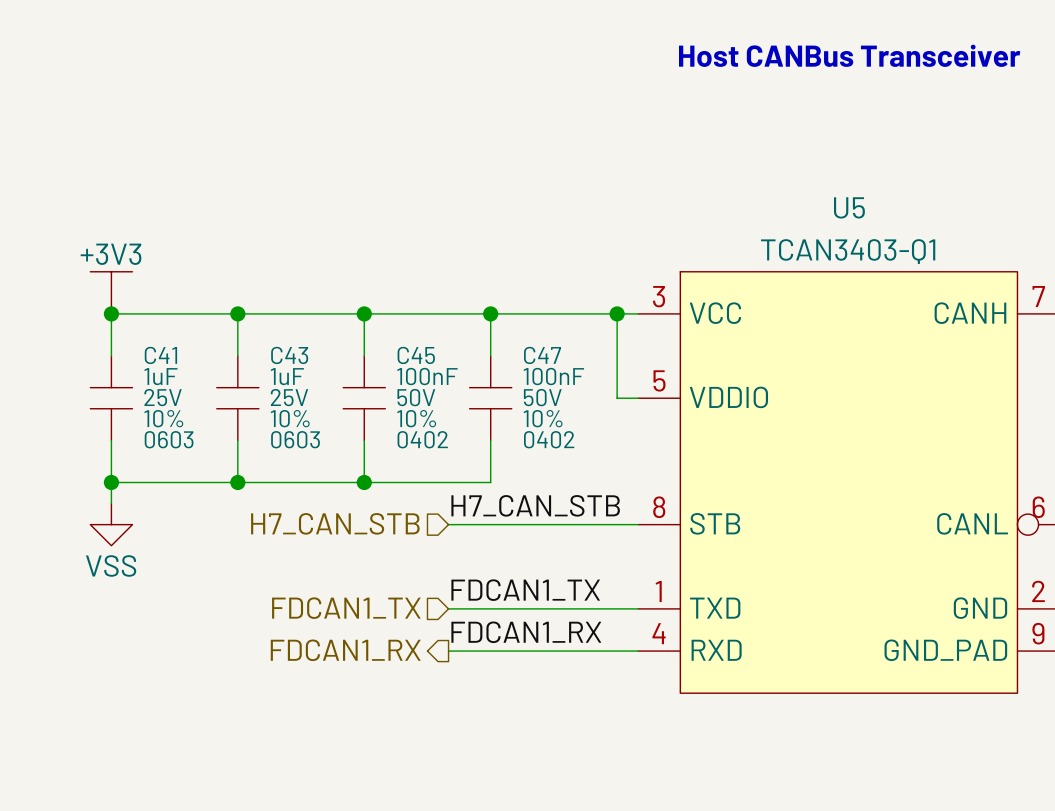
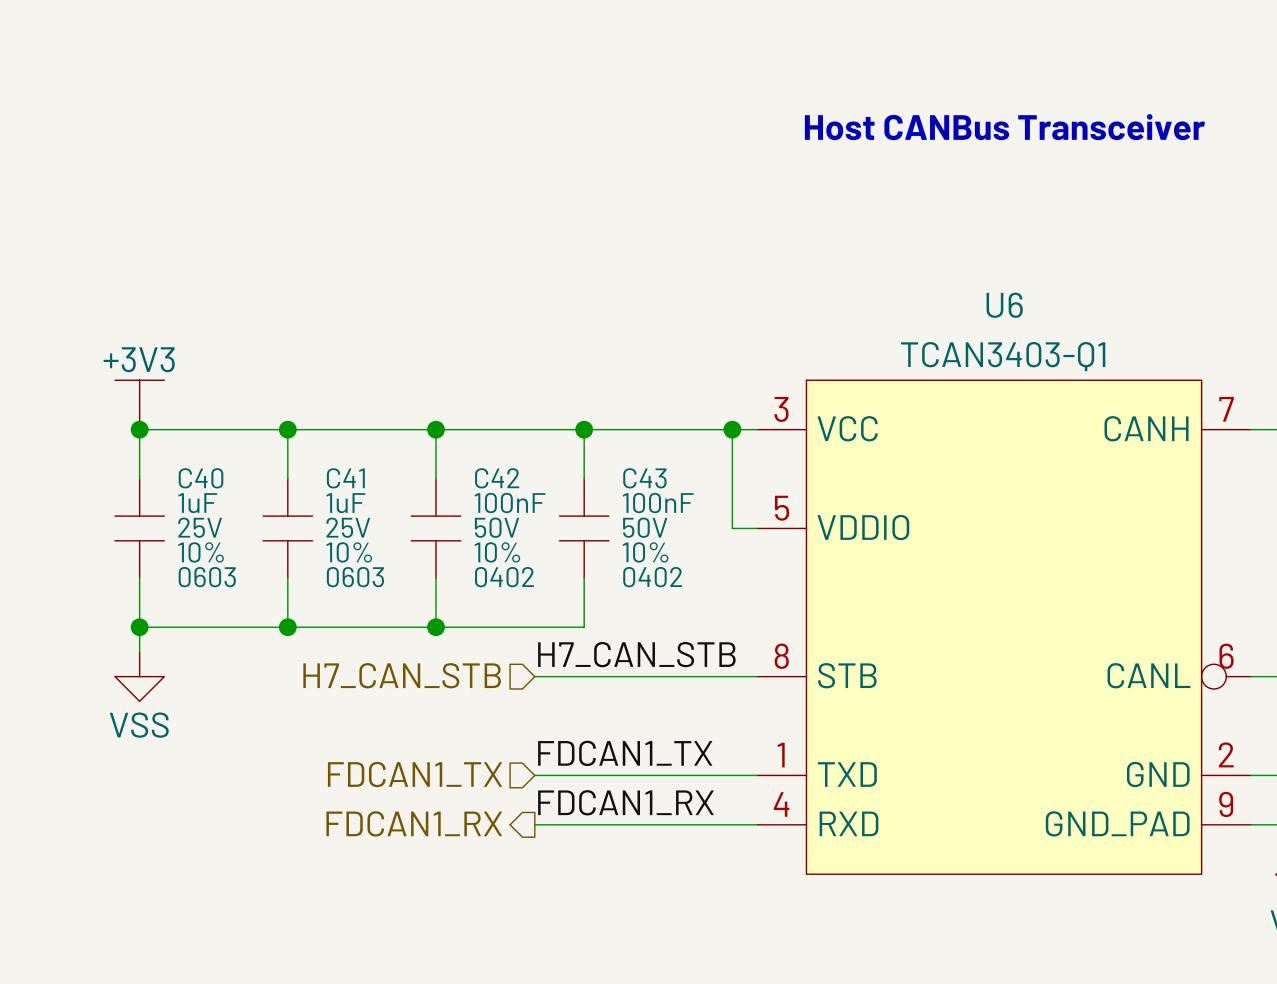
U5 name: U5 (849, 207) -> U6 (1004, 305)
C41 name: C41 (160, 355) -> C40 (201, 478)
C43 name: C43 (289, 355) -> C41 (345, 478)
C45 name: C45 (416, 355) -> C42 (497, 478)
C47 name: C47 (542, 355) -> C43 (644, 478)

